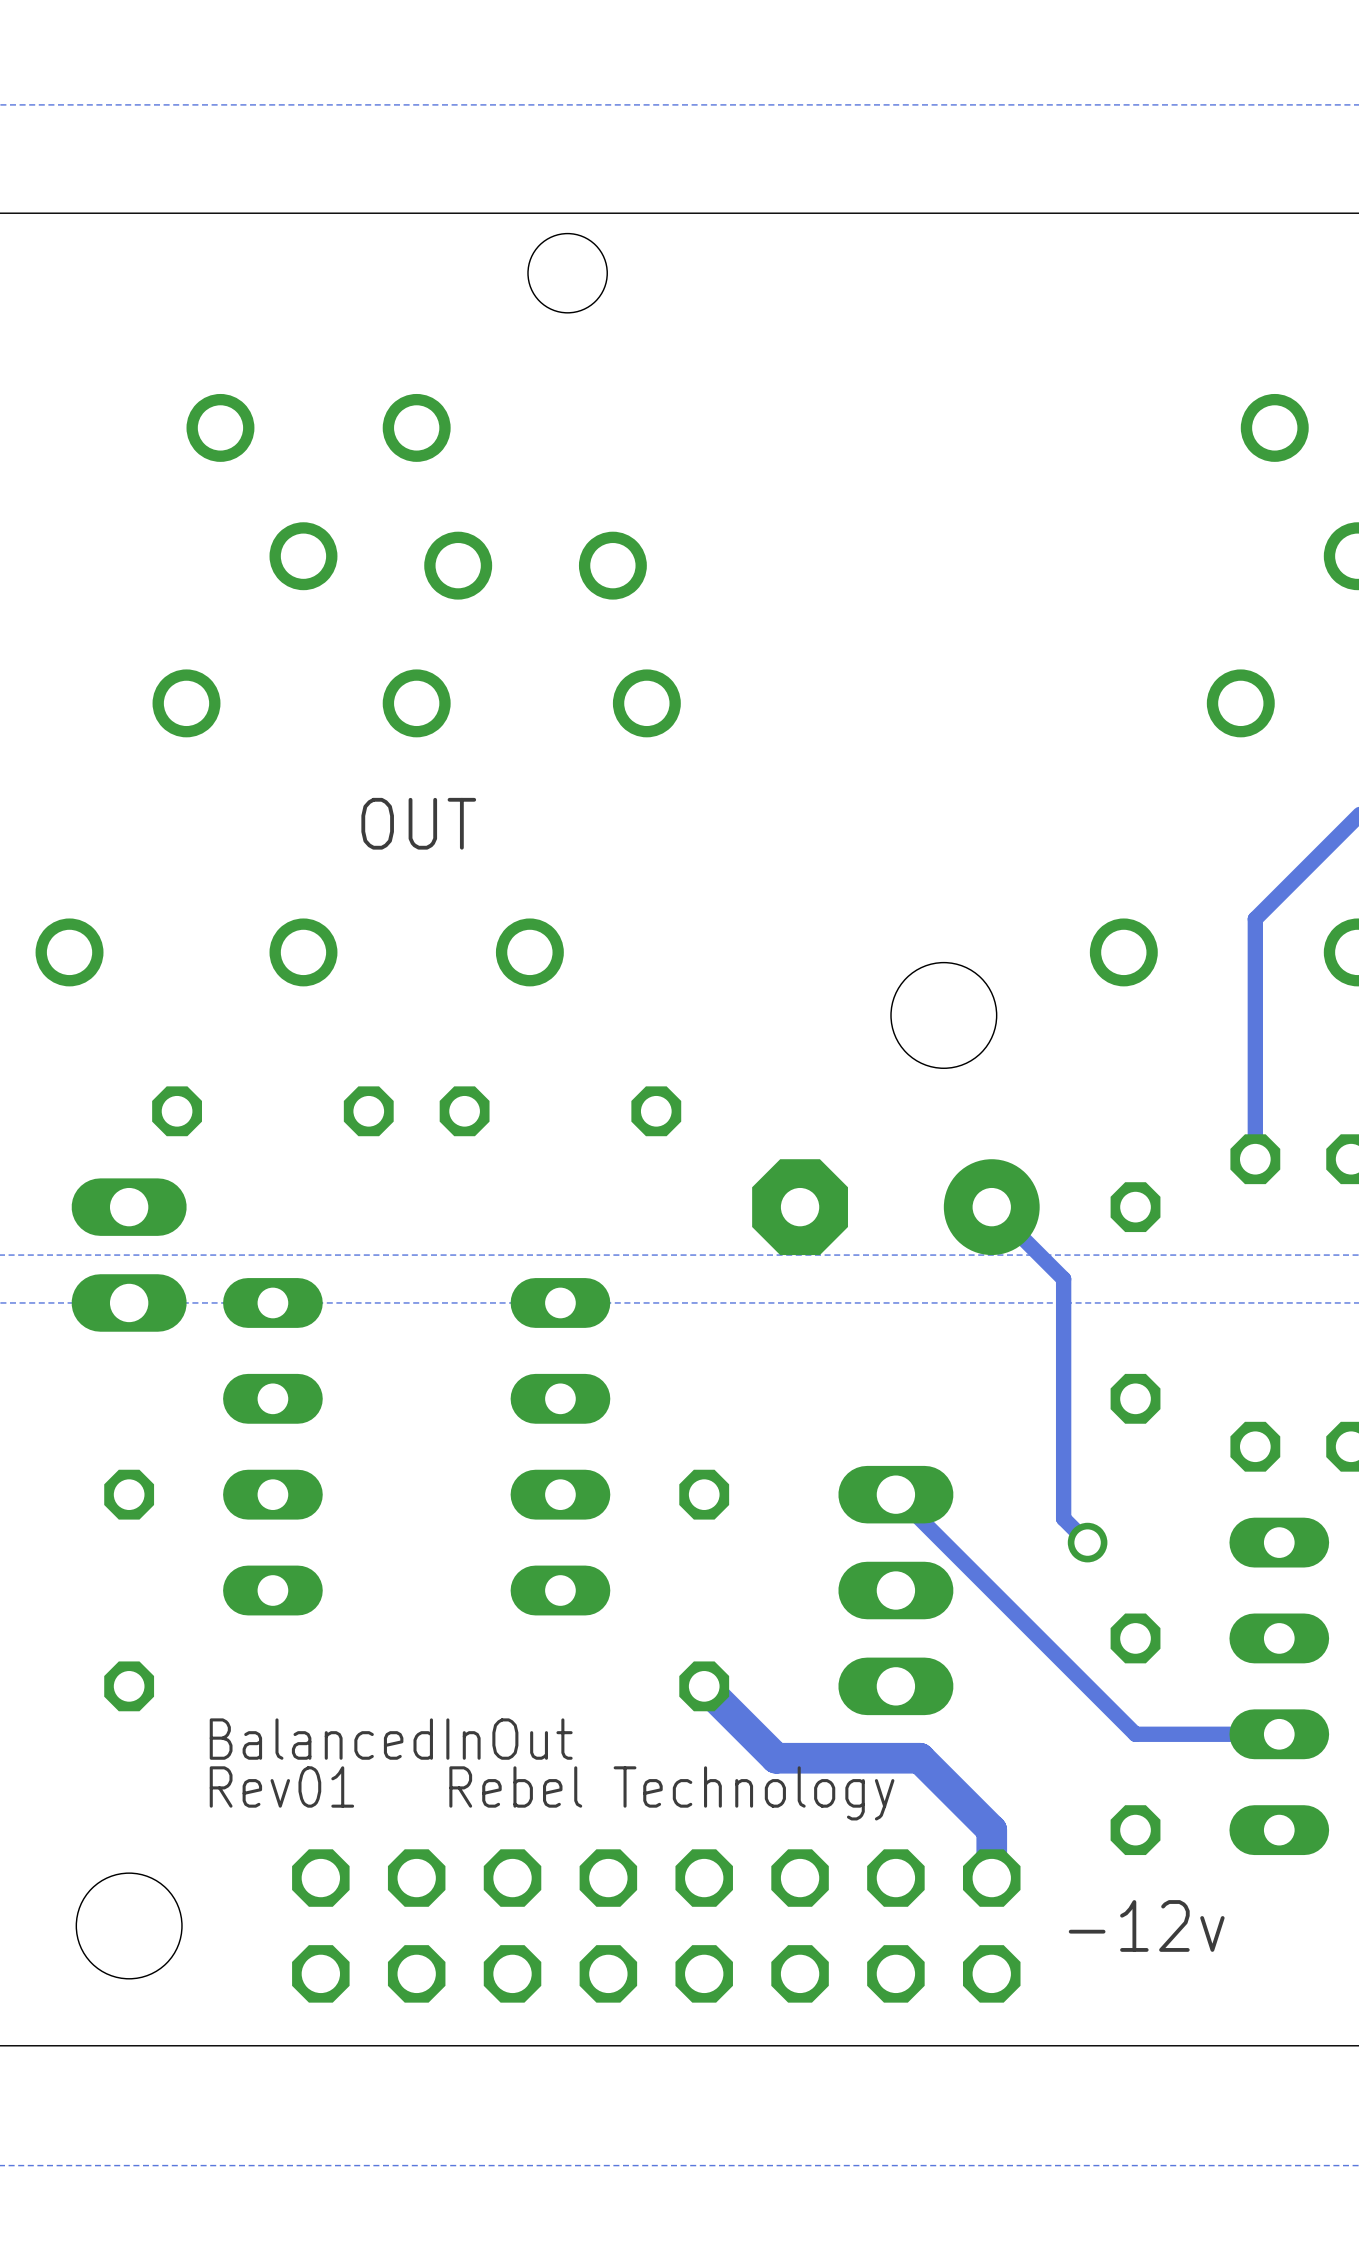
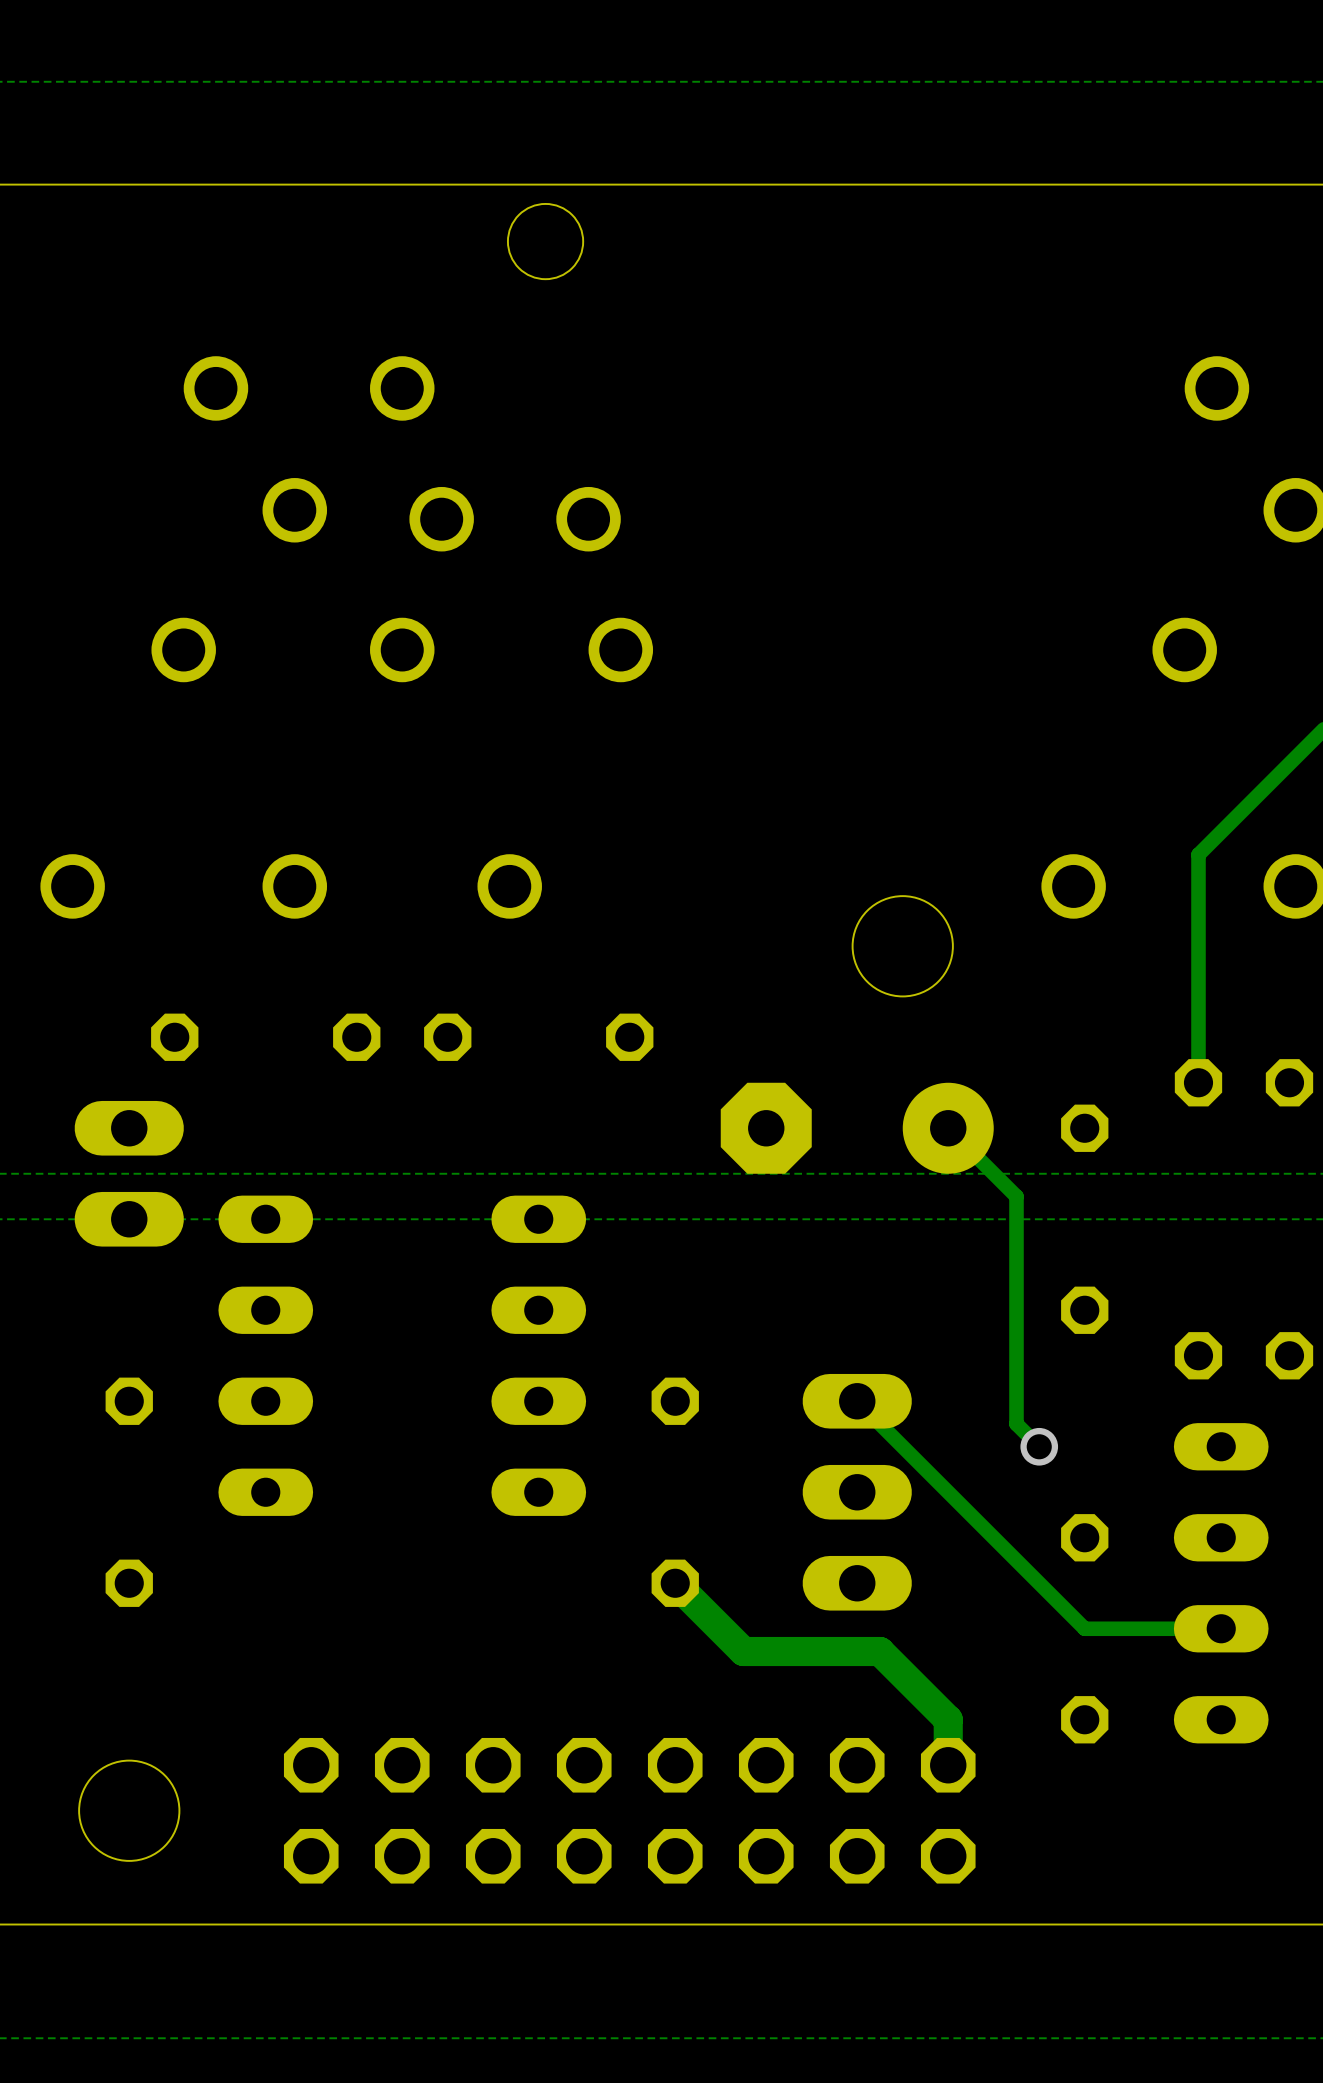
text: OUT (418, 823) -> none
text: BalancedInOut (391, 1739) -> none
text: Rev01 (281, 1786) -> none
text: Rebel Technology (671, 1793) -> none
text: -12v (1146, 1925) -> none

